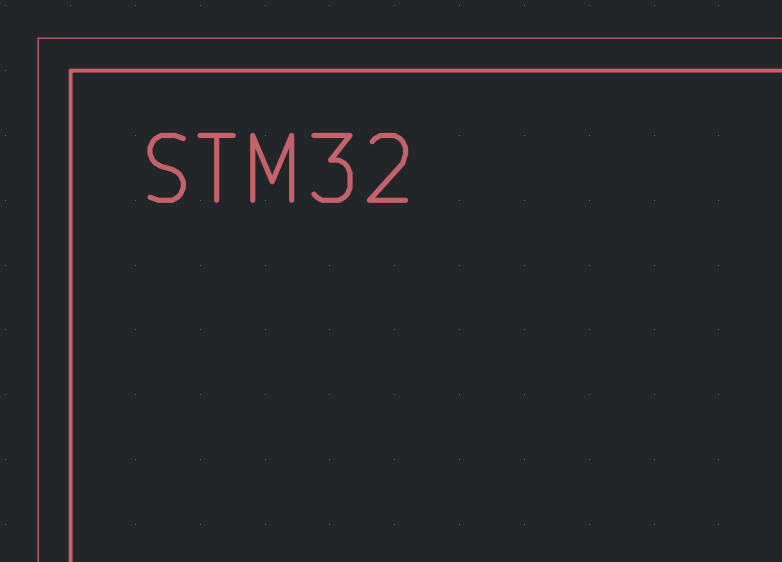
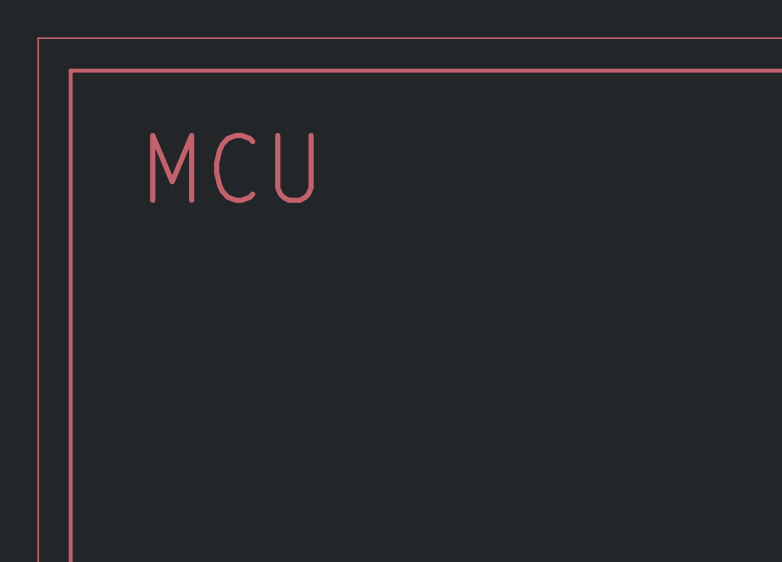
text: STM32 (277, 167) -> MCU (231, 167)

